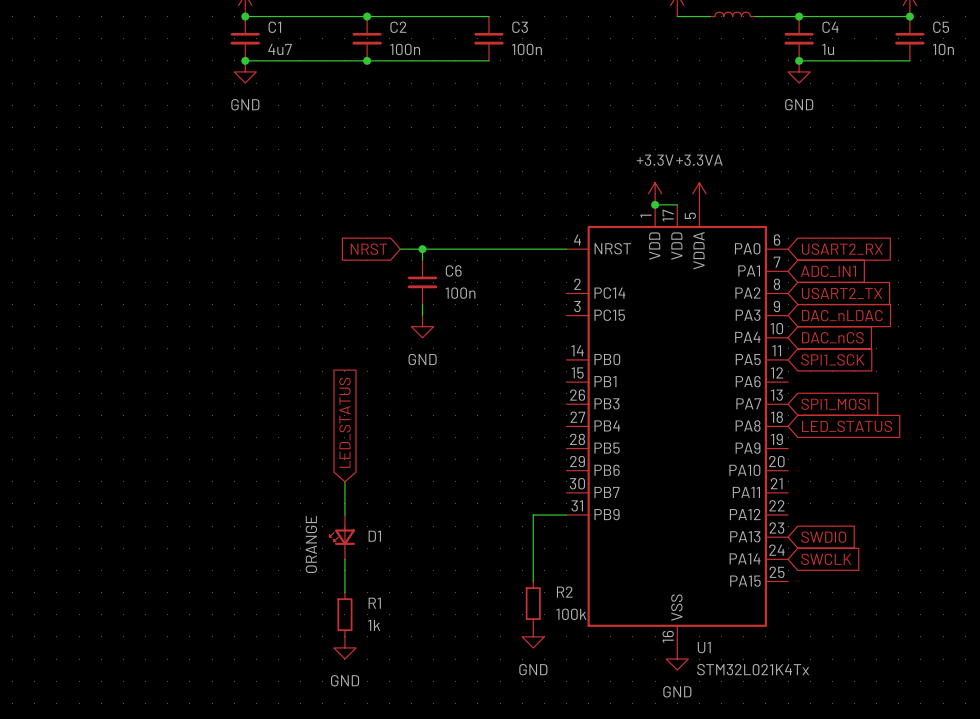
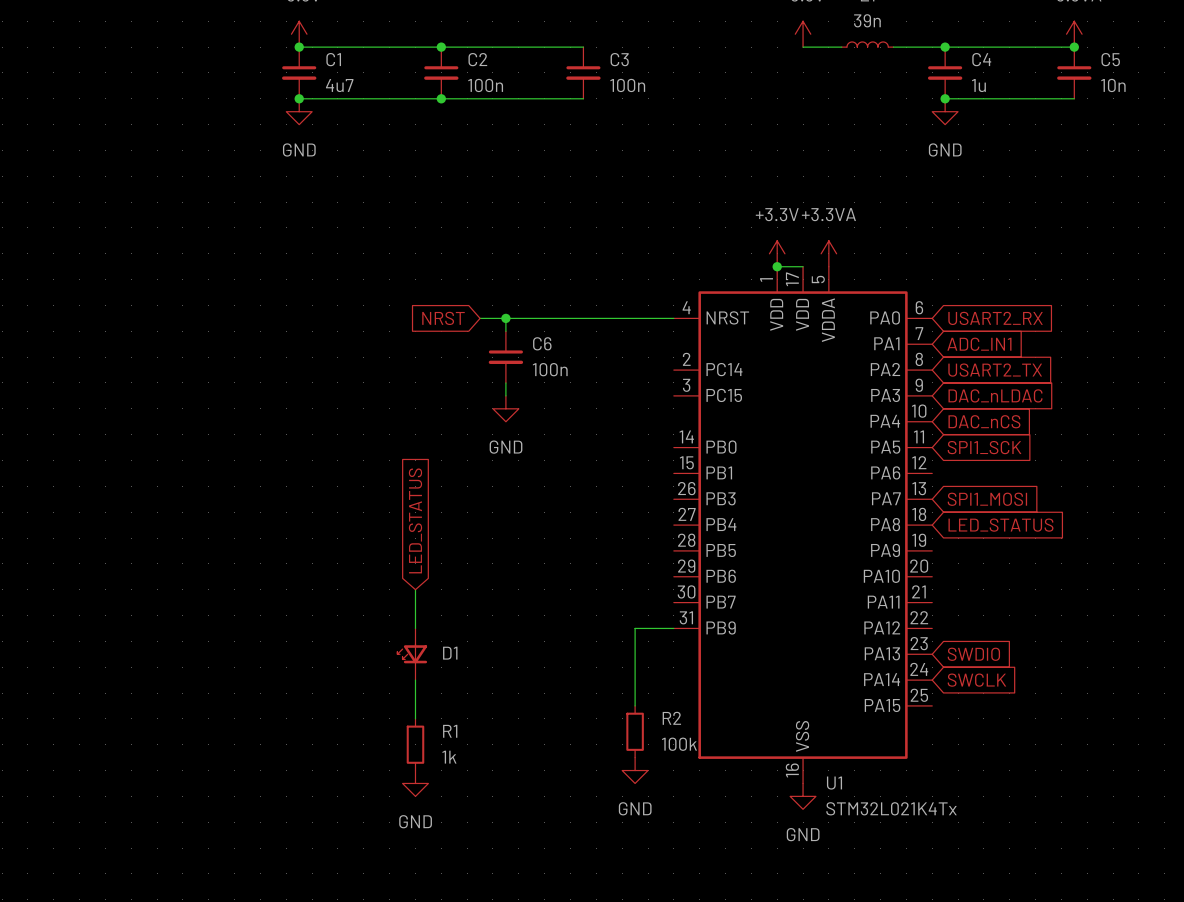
D1 value: ORANGE (311, 544) -> none

